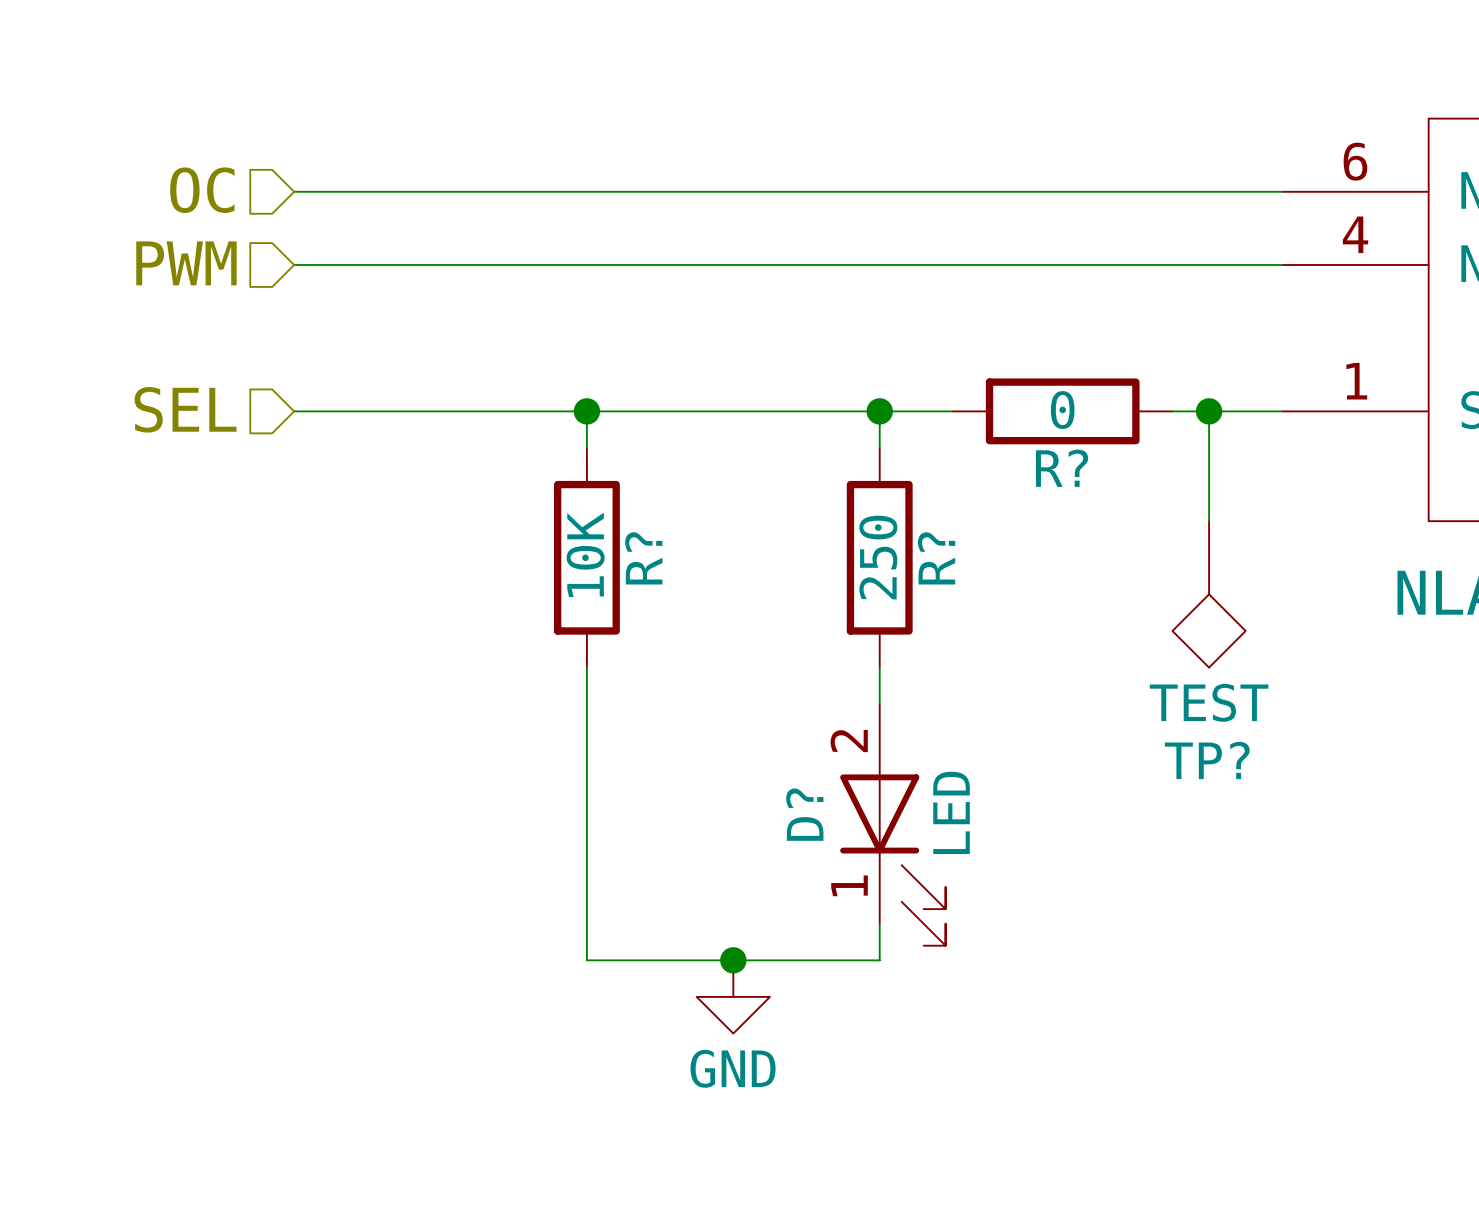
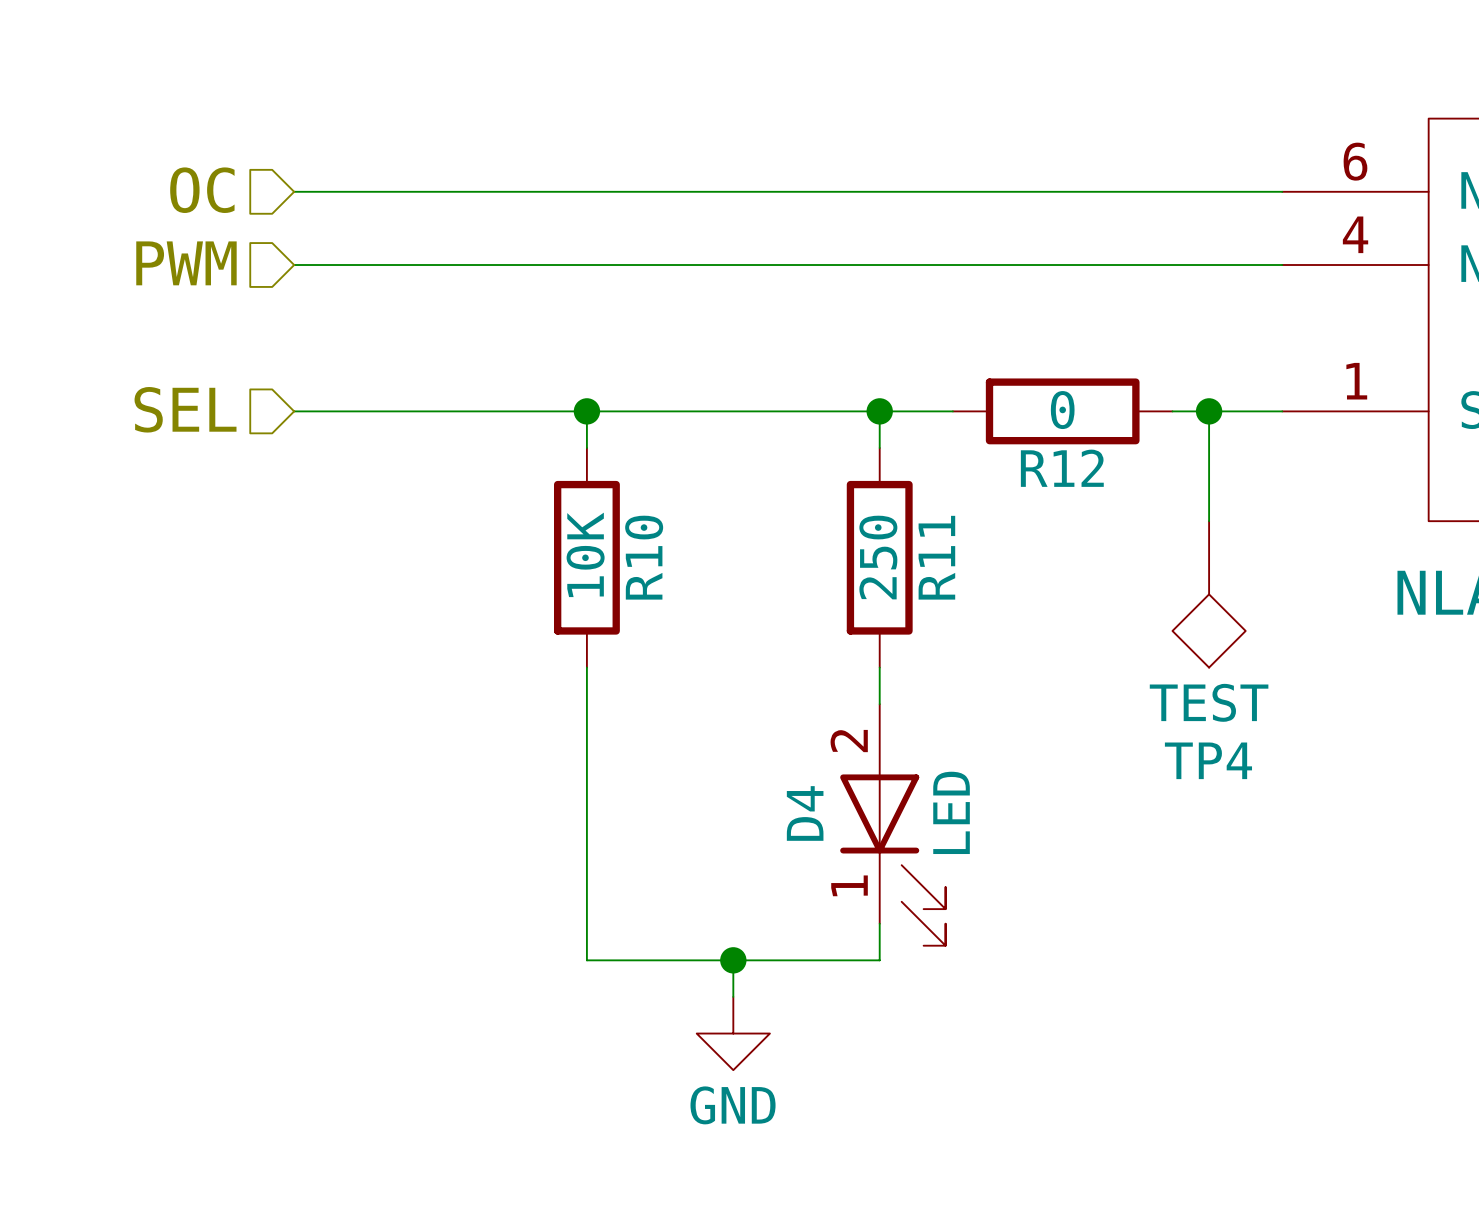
R? name: R? (1062, 468) -> R12 (1062, 468)
R? name: R? (643, 558) -> R10 (644, 557)
R? name: R? (936, 558) -> R11 (936, 557)
TP? name: TP? (1207, 760) -> TP4 (1208, 760)
D? name: D? (804, 814) -> D4 (805, 813)
power symbol position: GND (733, 996) -> GND (733, 1033)

